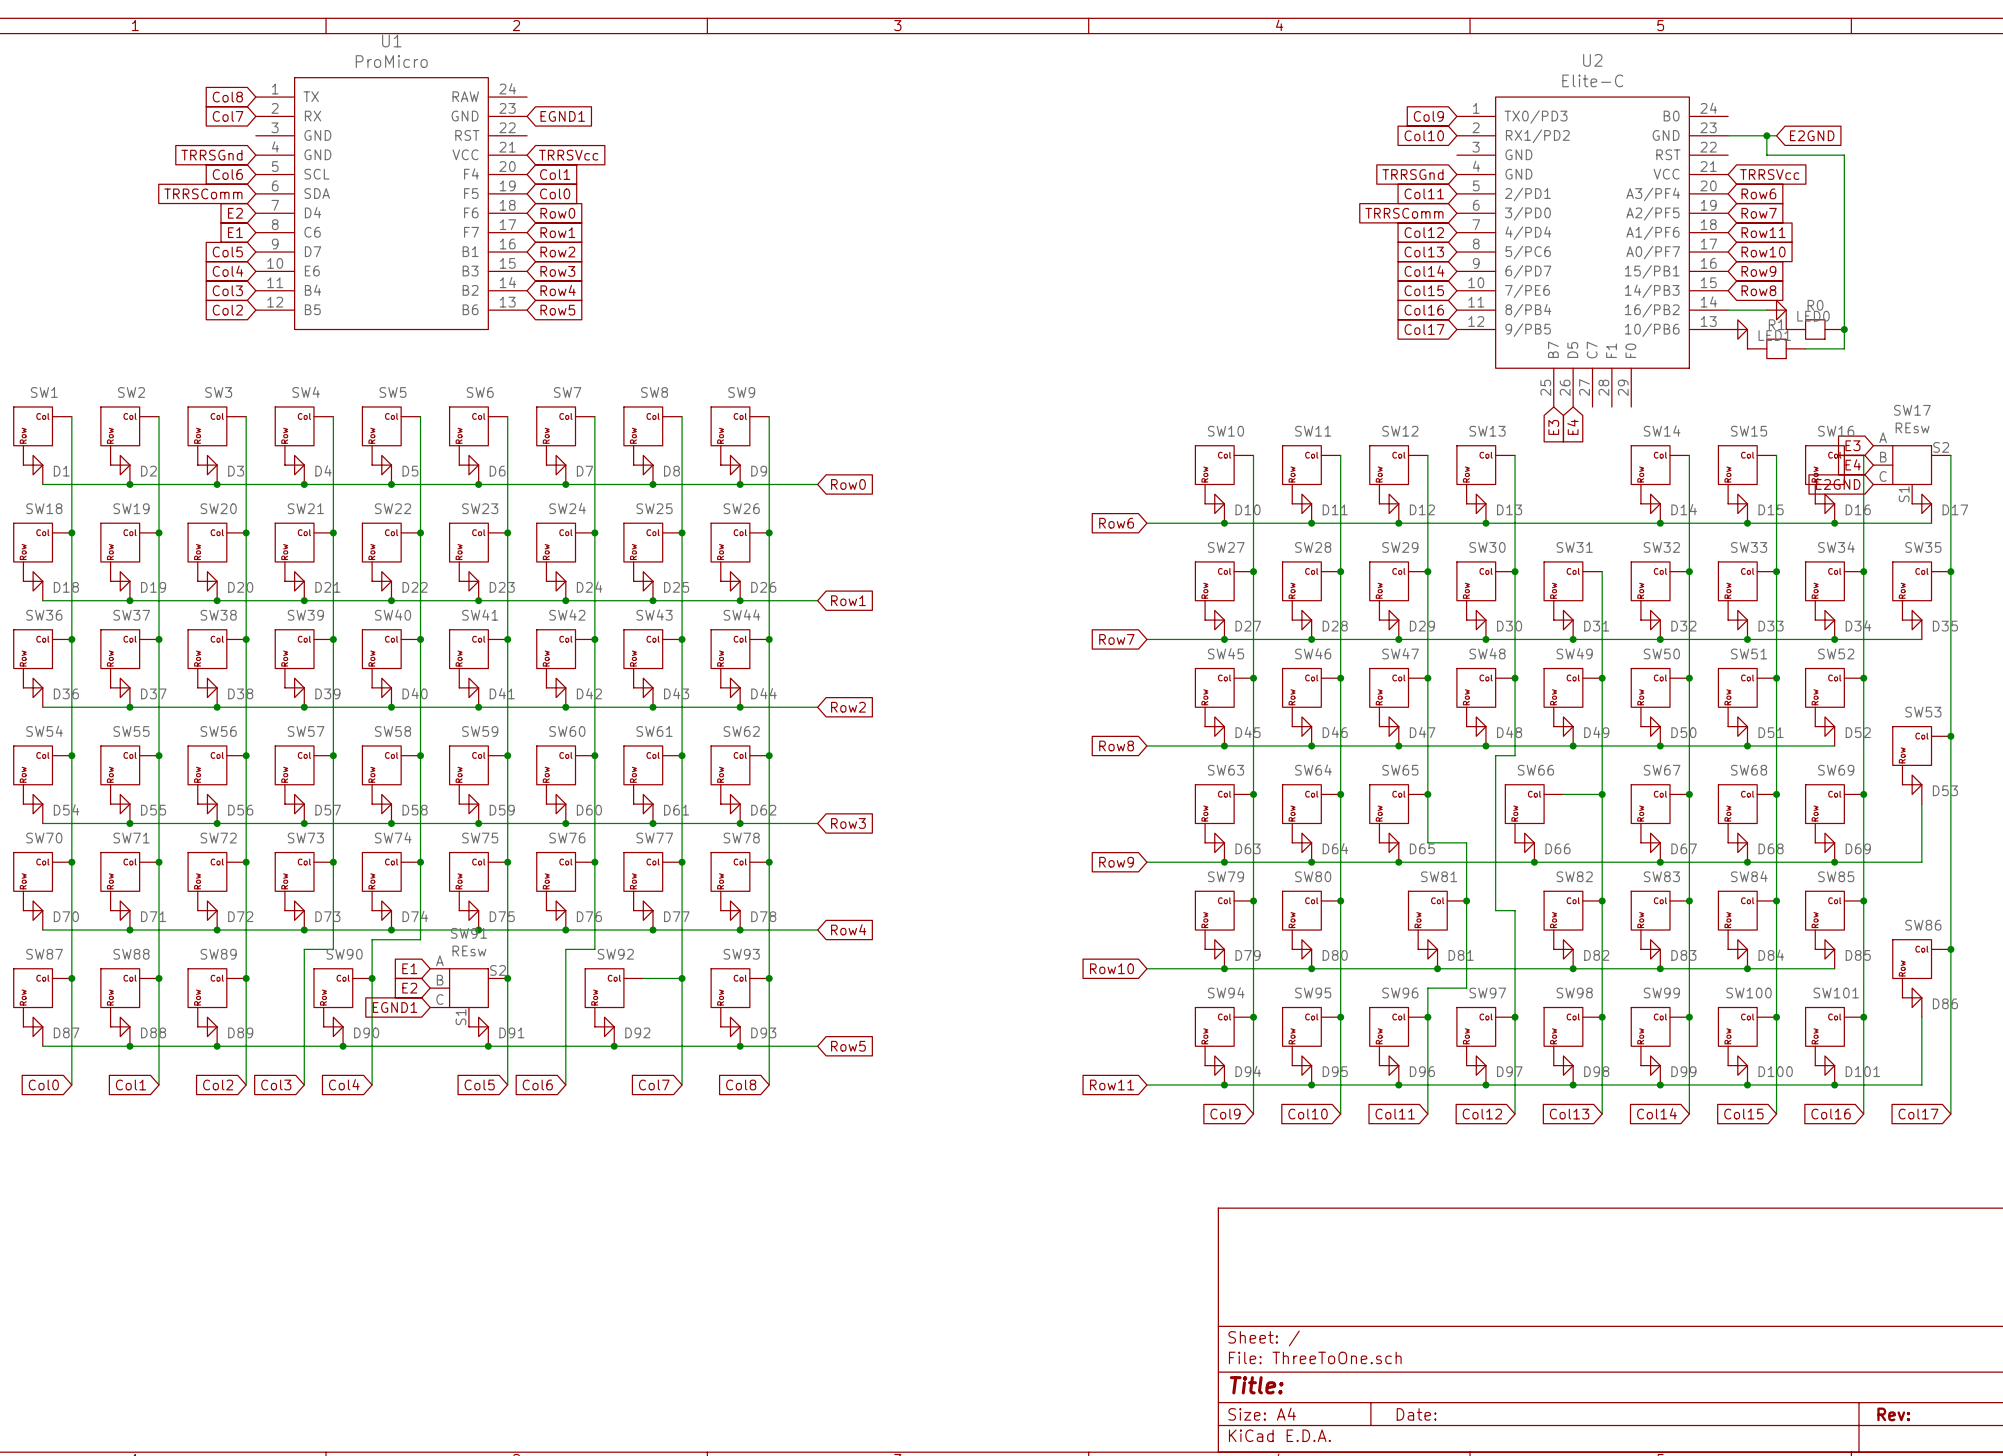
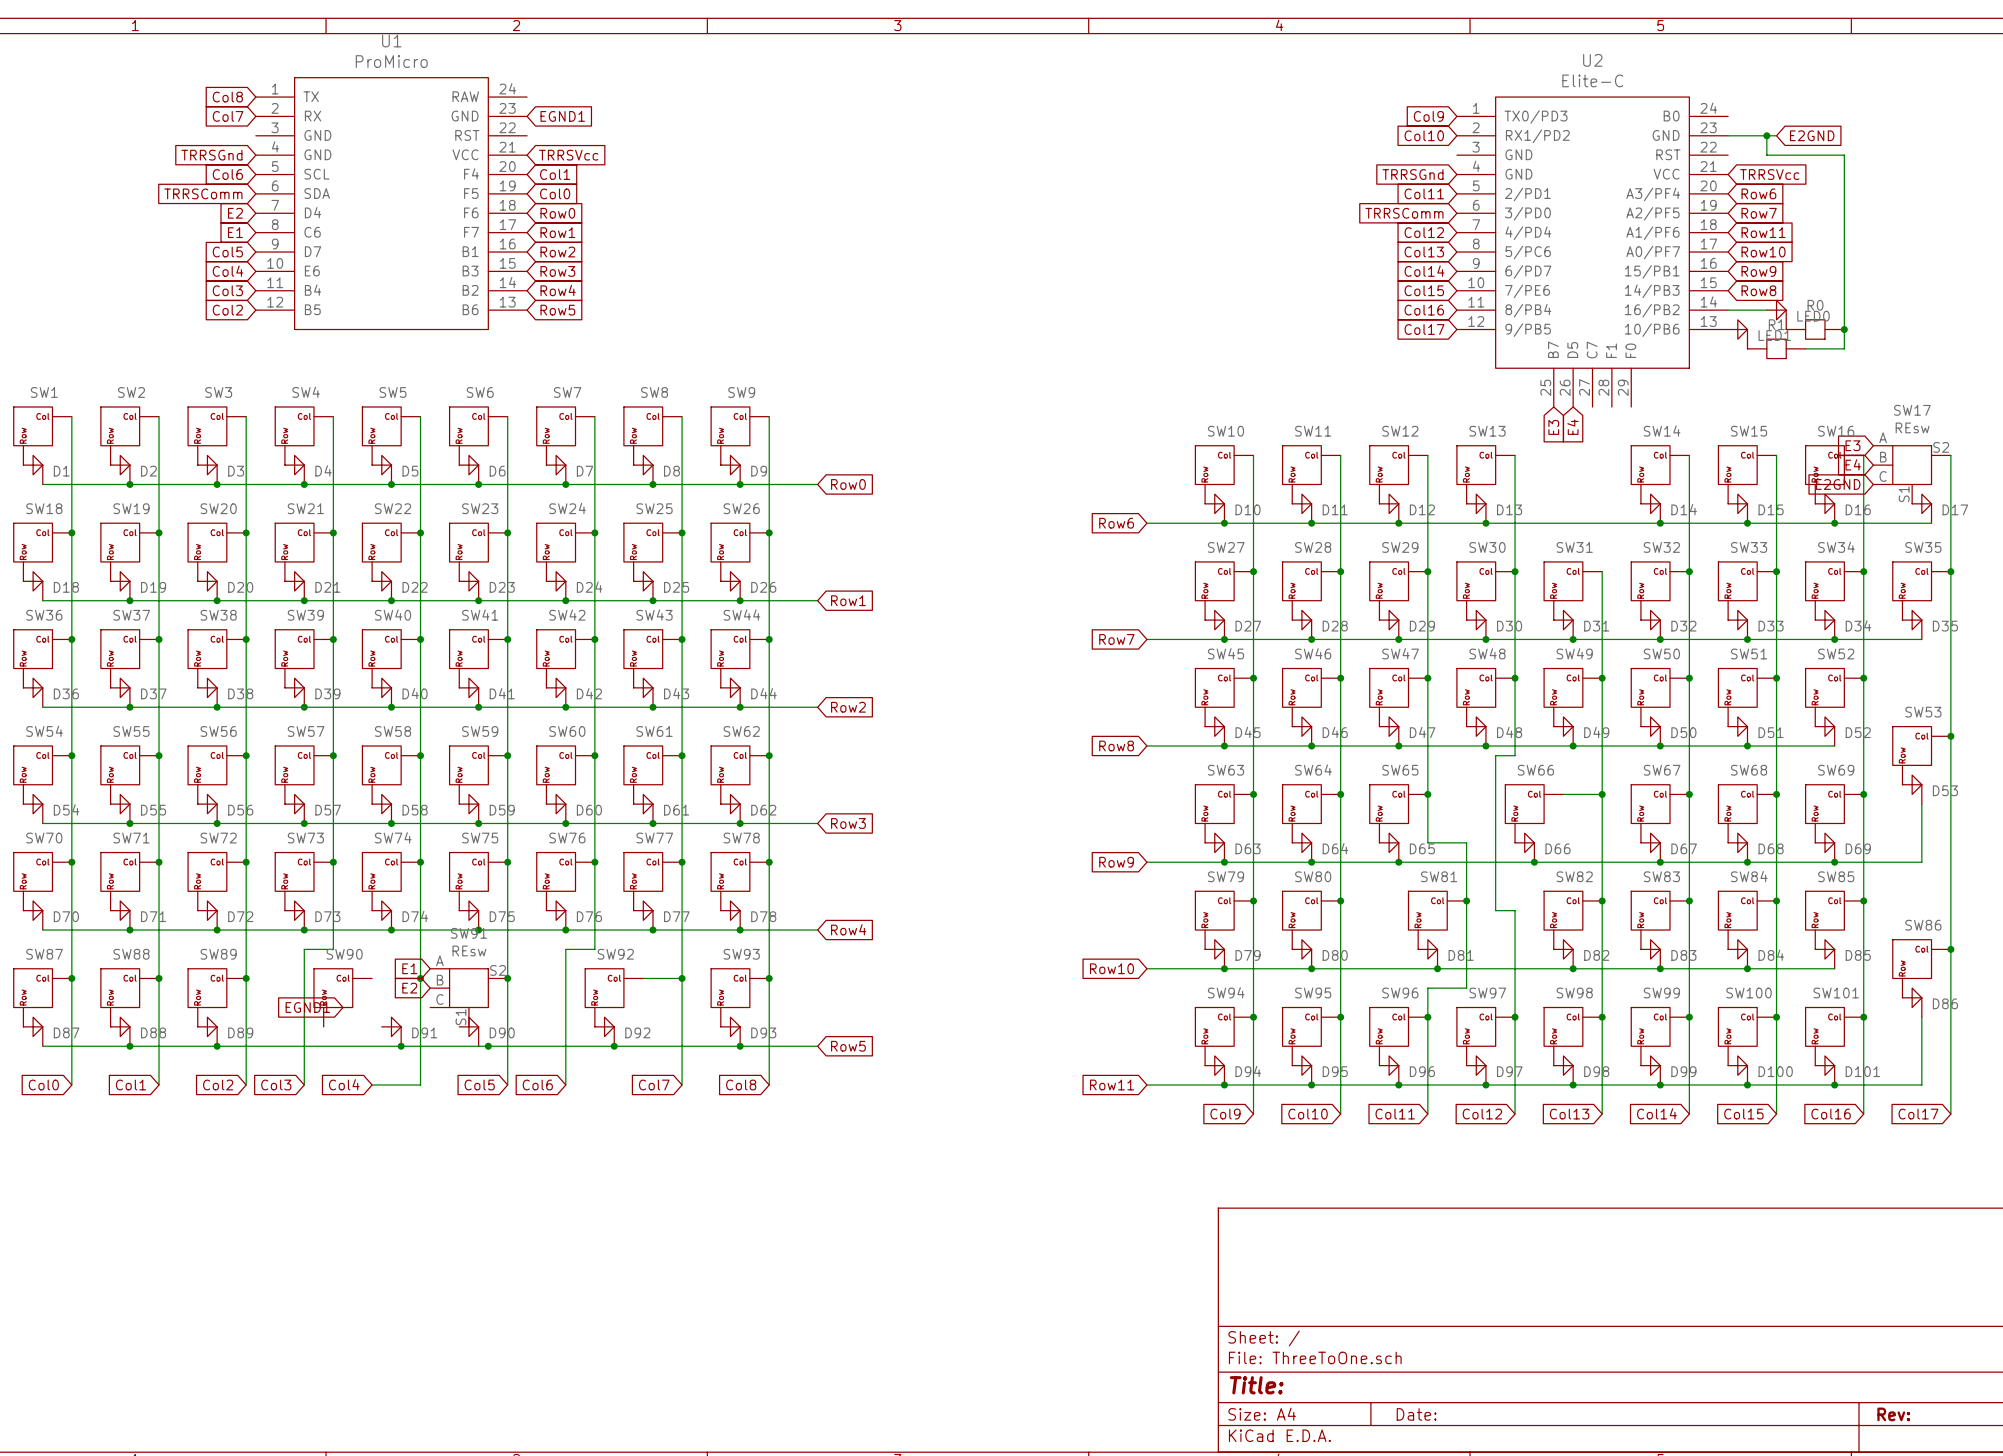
wire: (420, 939) (372, 939) (372, 1085) -> (420, 939) (420, 1085) (372, 1085)
junction: (372, 978) -> none
junction: none -> (420, 978)
global label position: EGND1 (395, 1007) -> EGND1 (307, 1007)
D90 position: (333, 1031) -> (468, 1031)
D91 position: (478, 1031) -> (391, 1031)
junction: (343, 1046) -> none
junction: none -> (401, 1046)

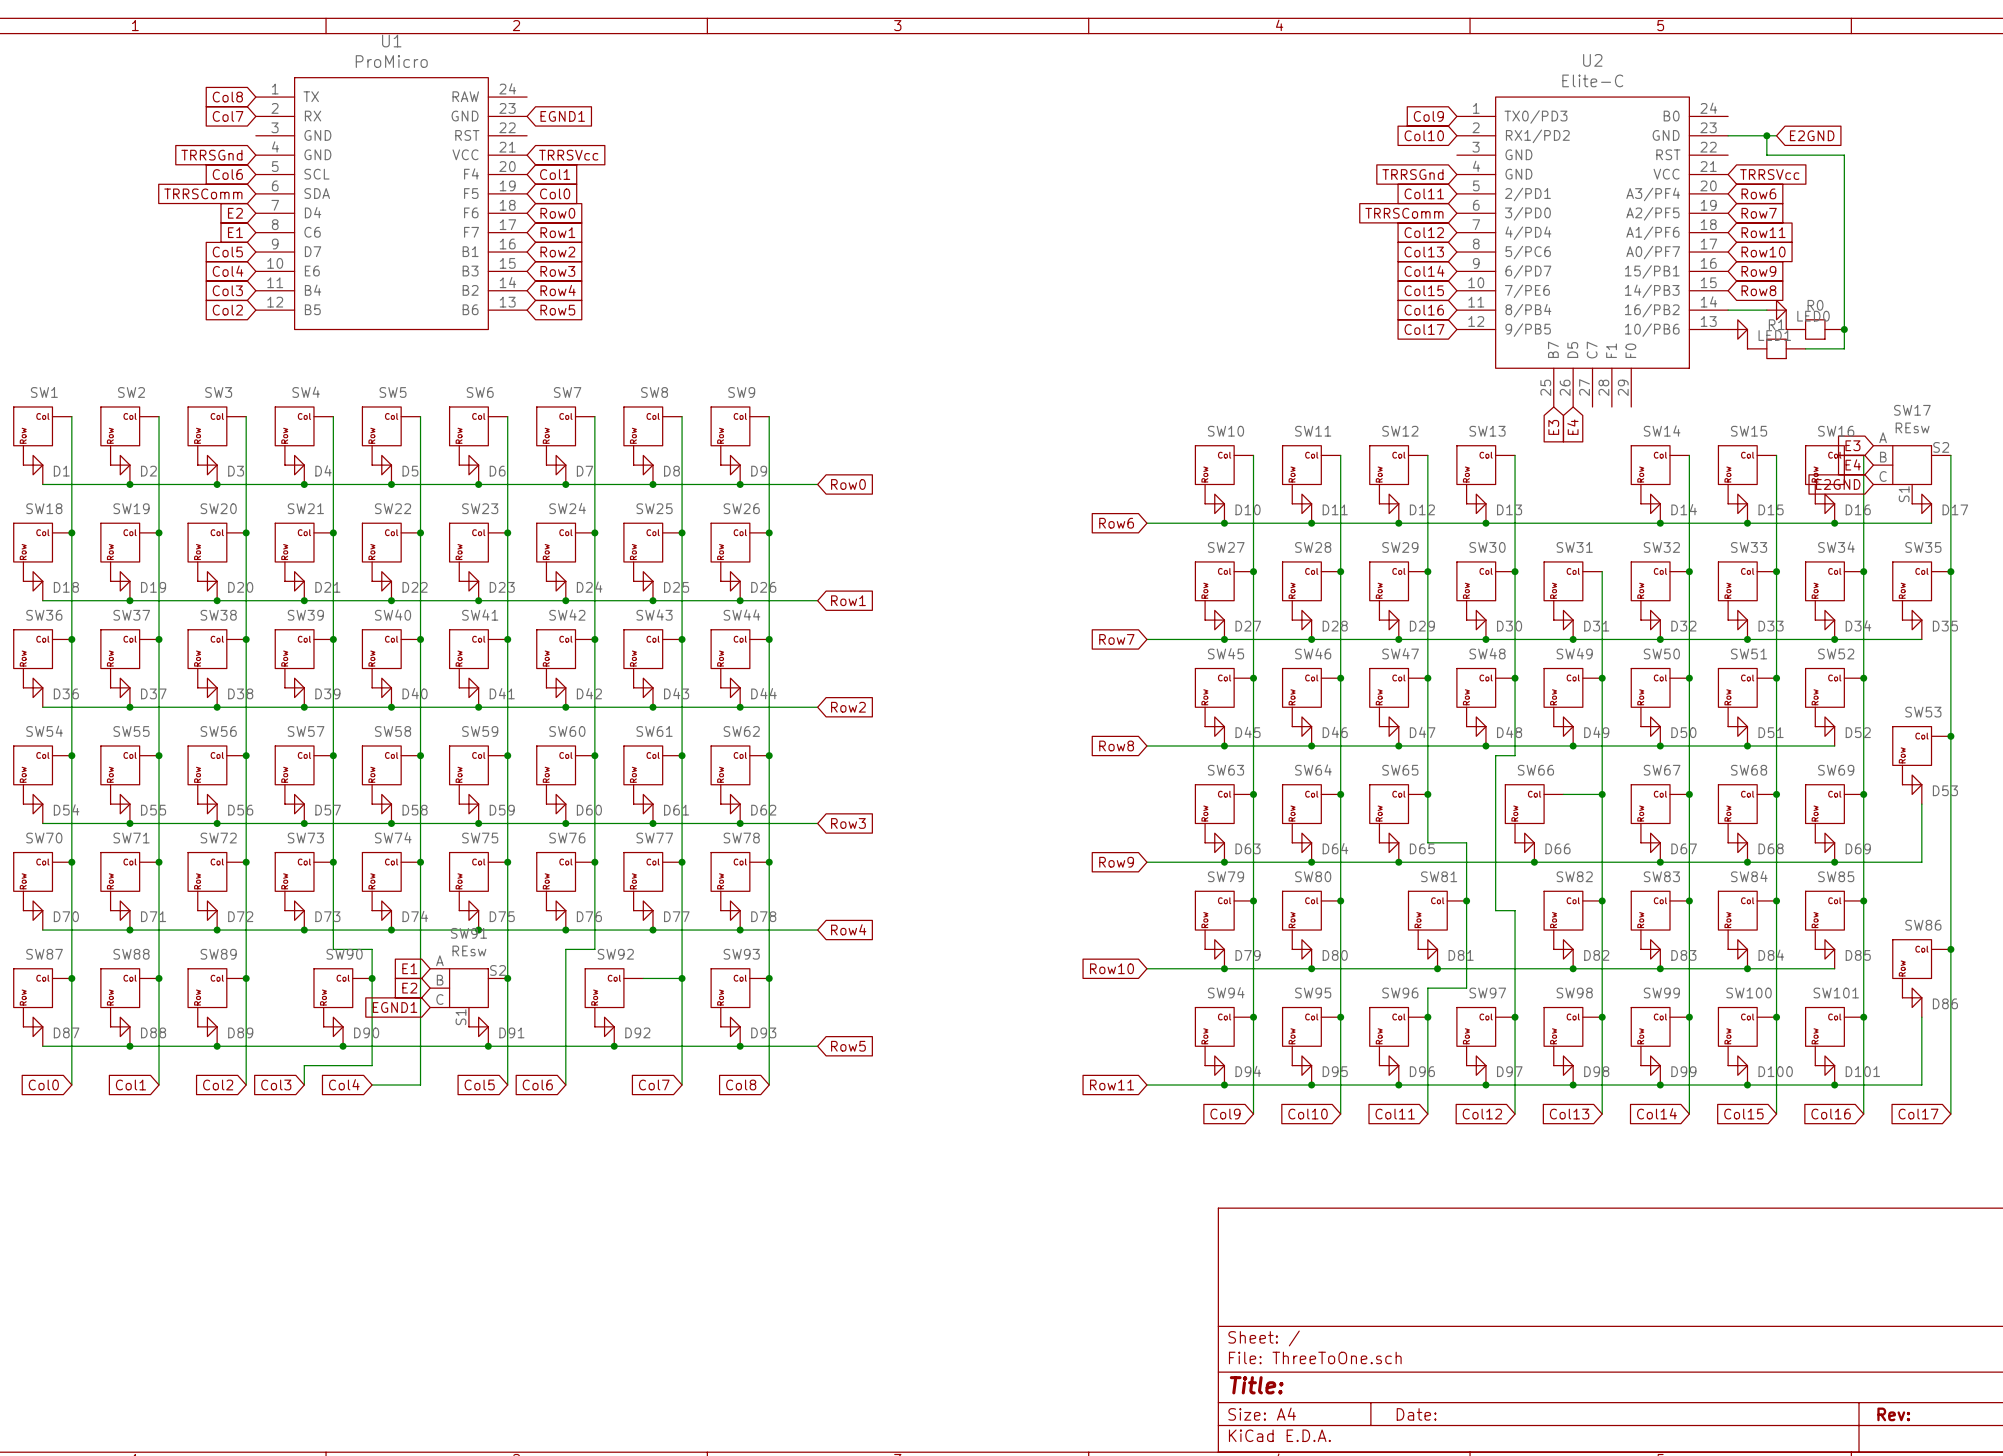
wire: (333, 949) (304, 949) (304, 1065) -> (333, 949) (372, 949) (372, 1065) (304, 1065)
junction: none -> (372, 978)
junction: (420, 978) -> none
global label position: EGND1 (307, 1007) -> EGND1 (395, 1007)
D91 position: (391, 1031) -> (478, 1031)
D90 position: (468, 1031) -> (333, 1031)
junction: none -> (343, 1046)
junction: (401, 1046) -> none

